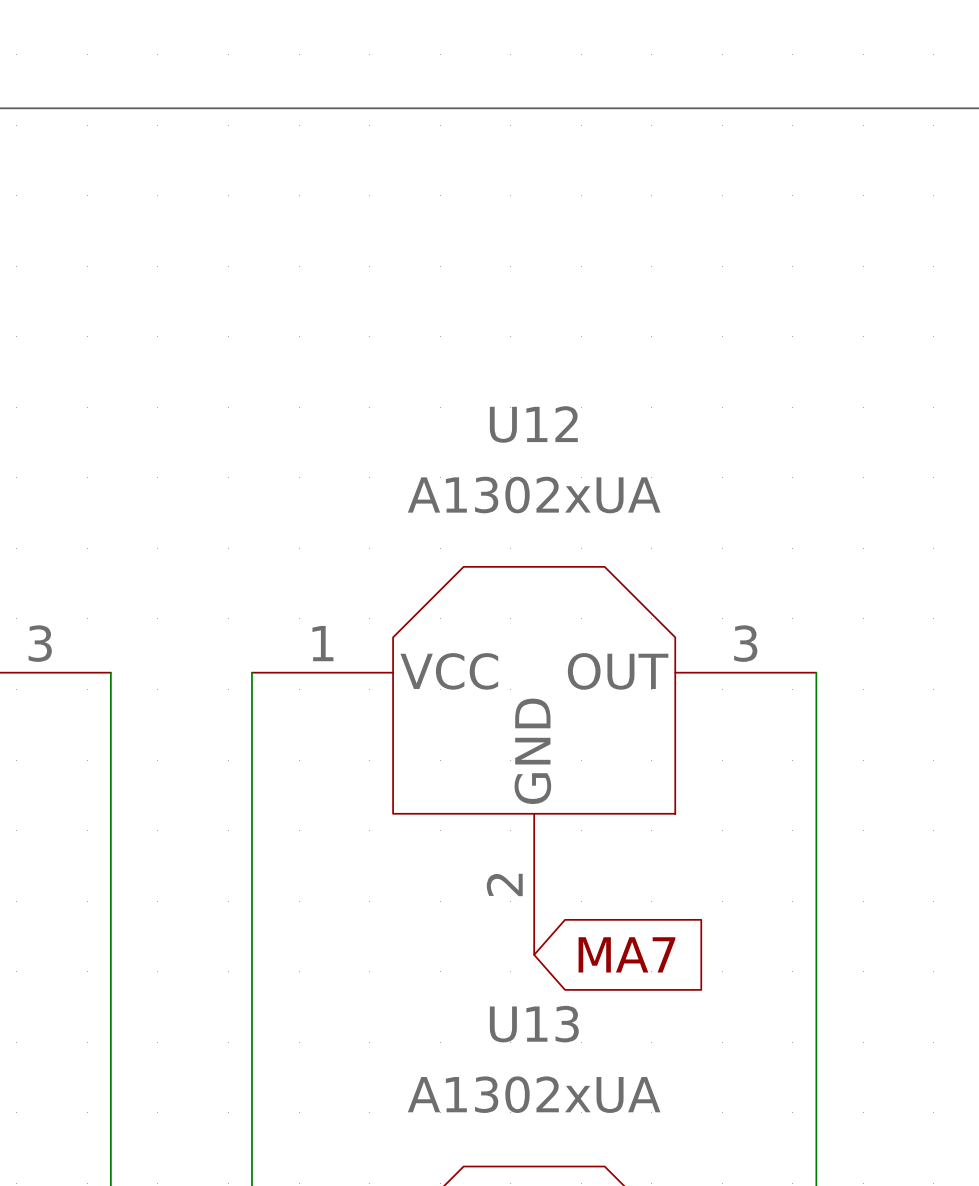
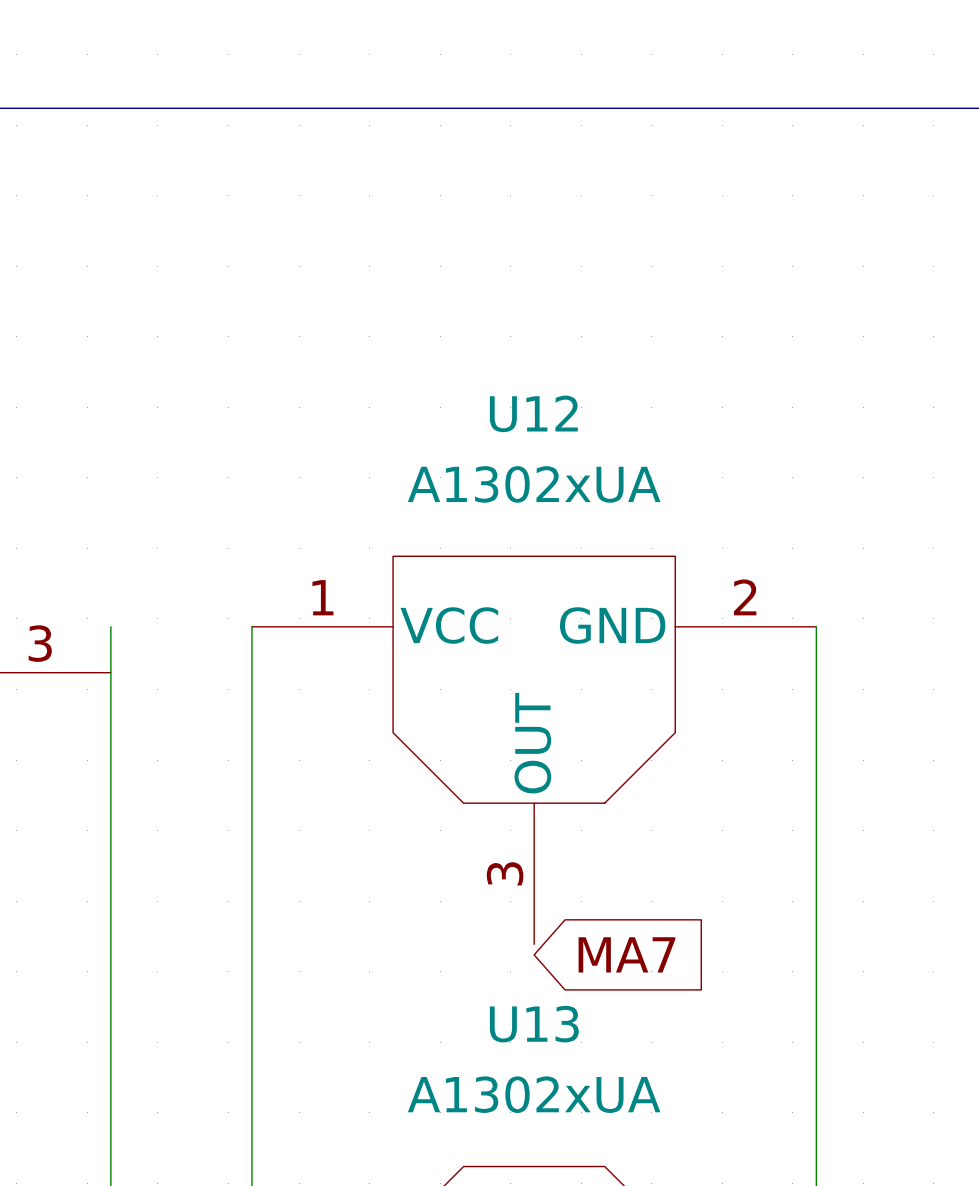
U12 symbol: [251, 566, 817, 955] -> [251, 556, 817, 945]
wire: none -> (110, 626) (110, 672)
wire: none -> (251, 626) (251, 672)
wire: none -> (816, 626) (816, 672)

